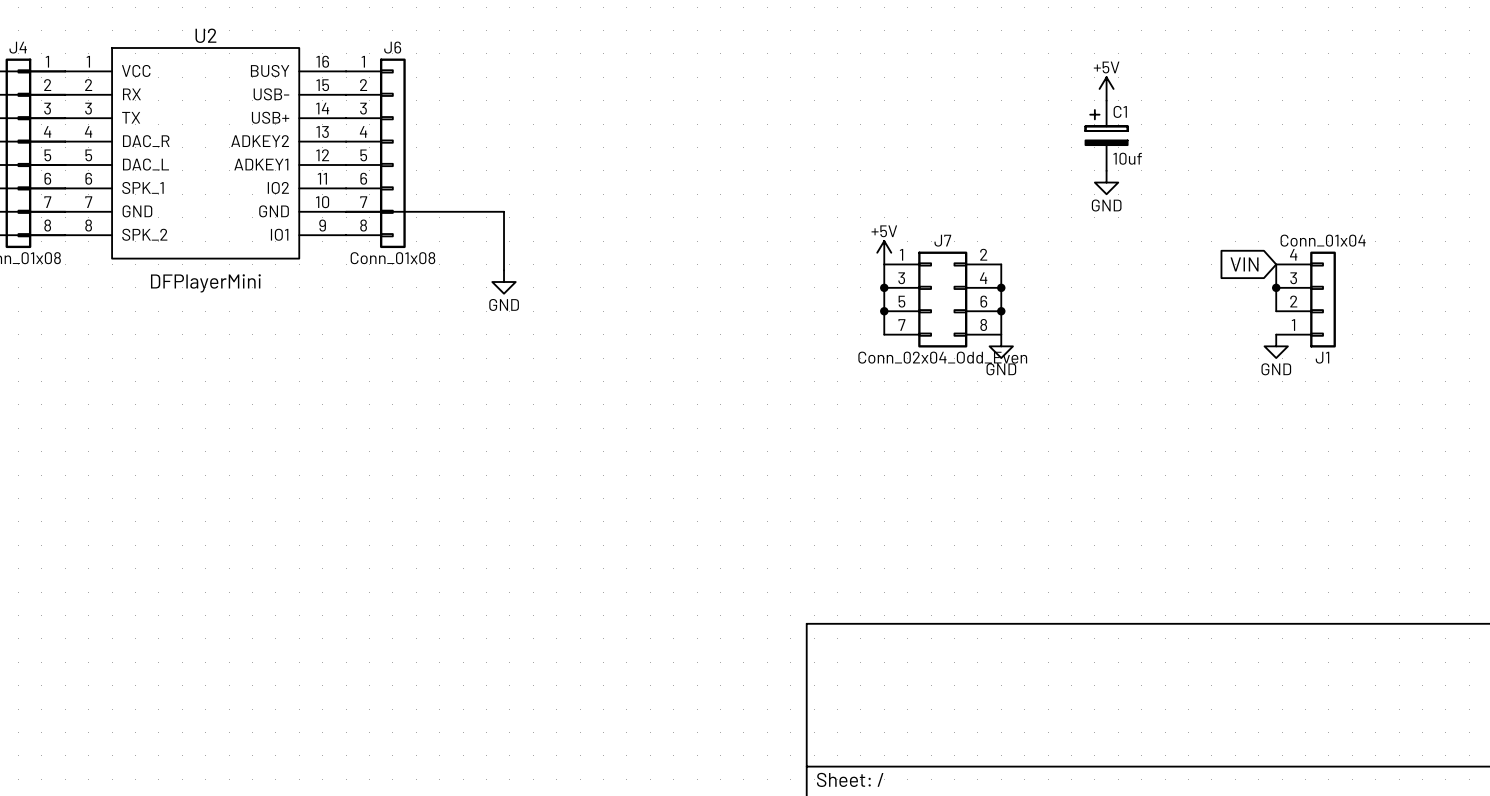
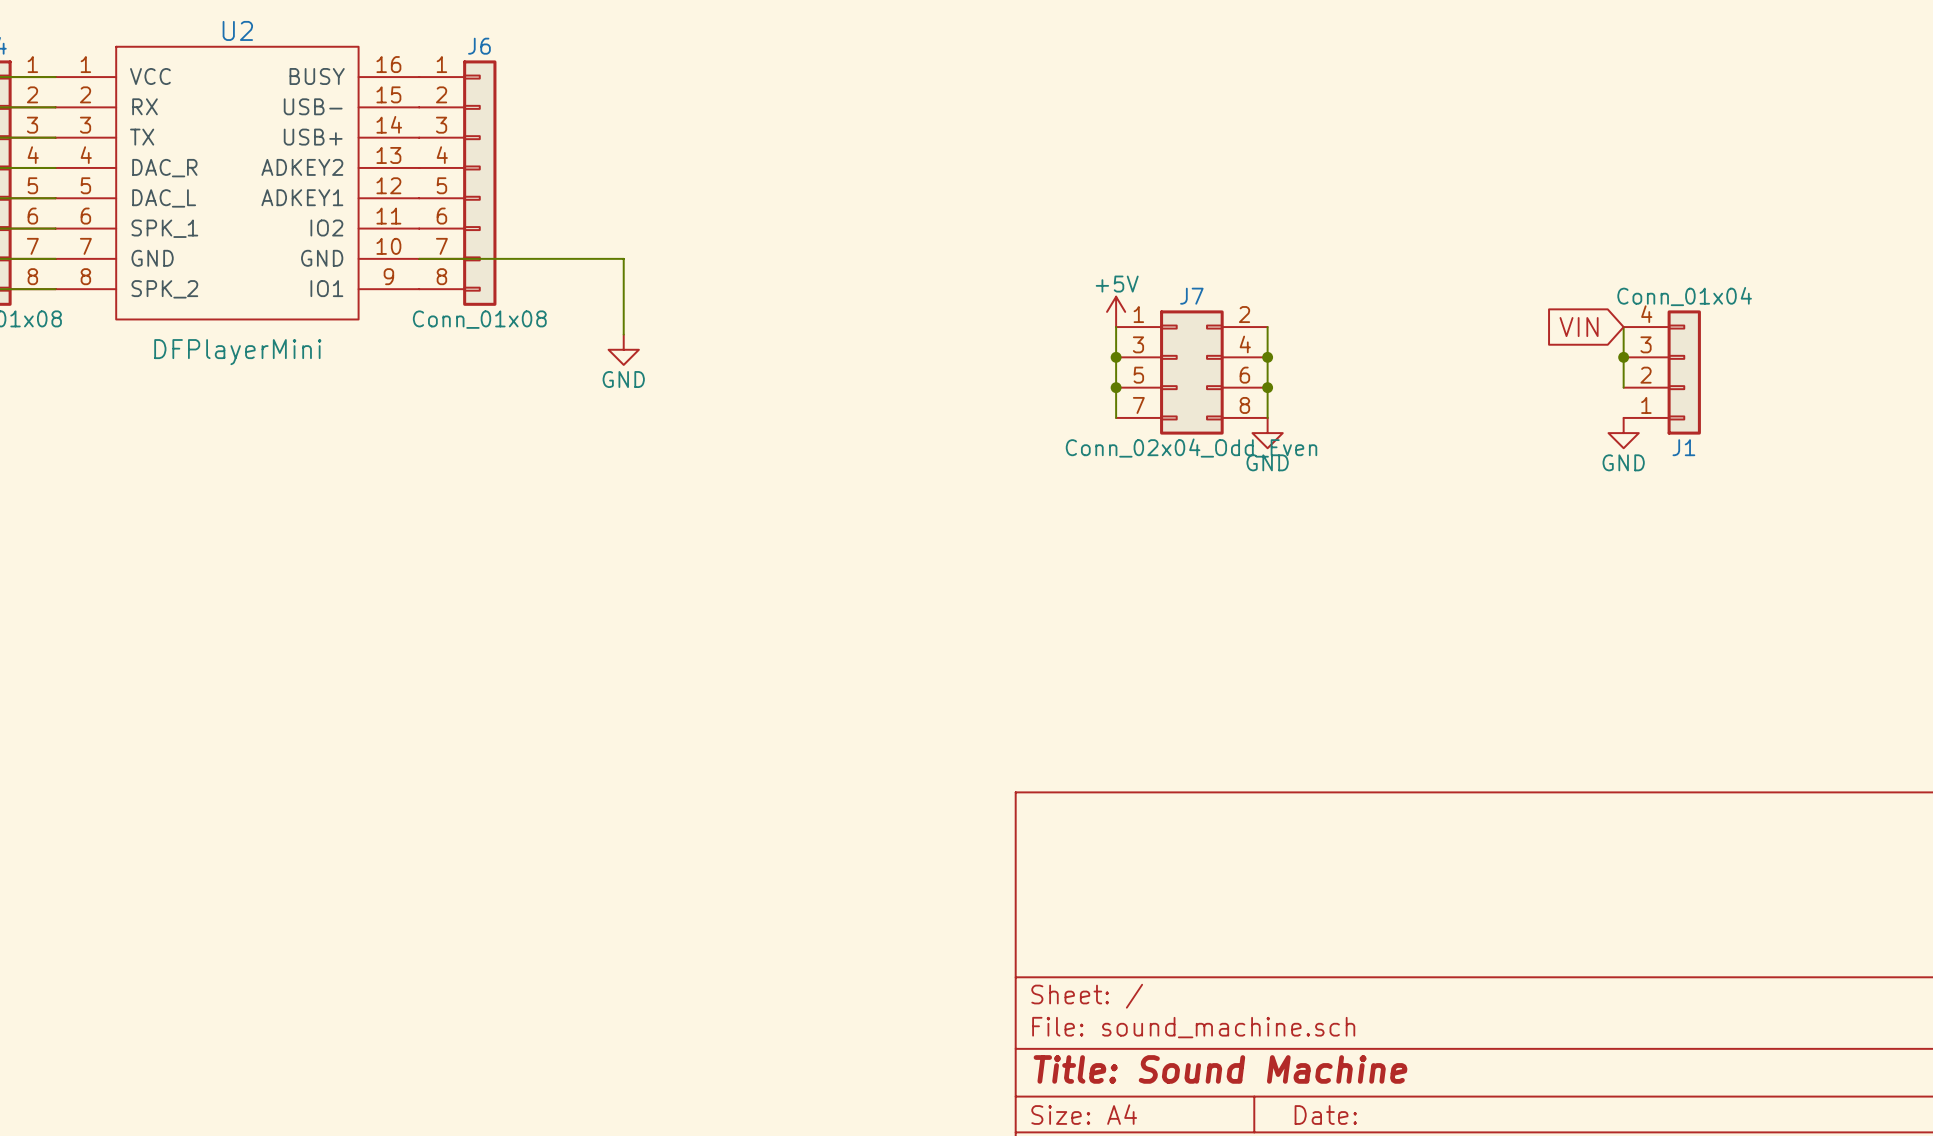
power symbol: +5V (1106, 88) -> none
C1: 10uf (1106, 135) -> none
power symbol: GND (1106, 182) -> none

